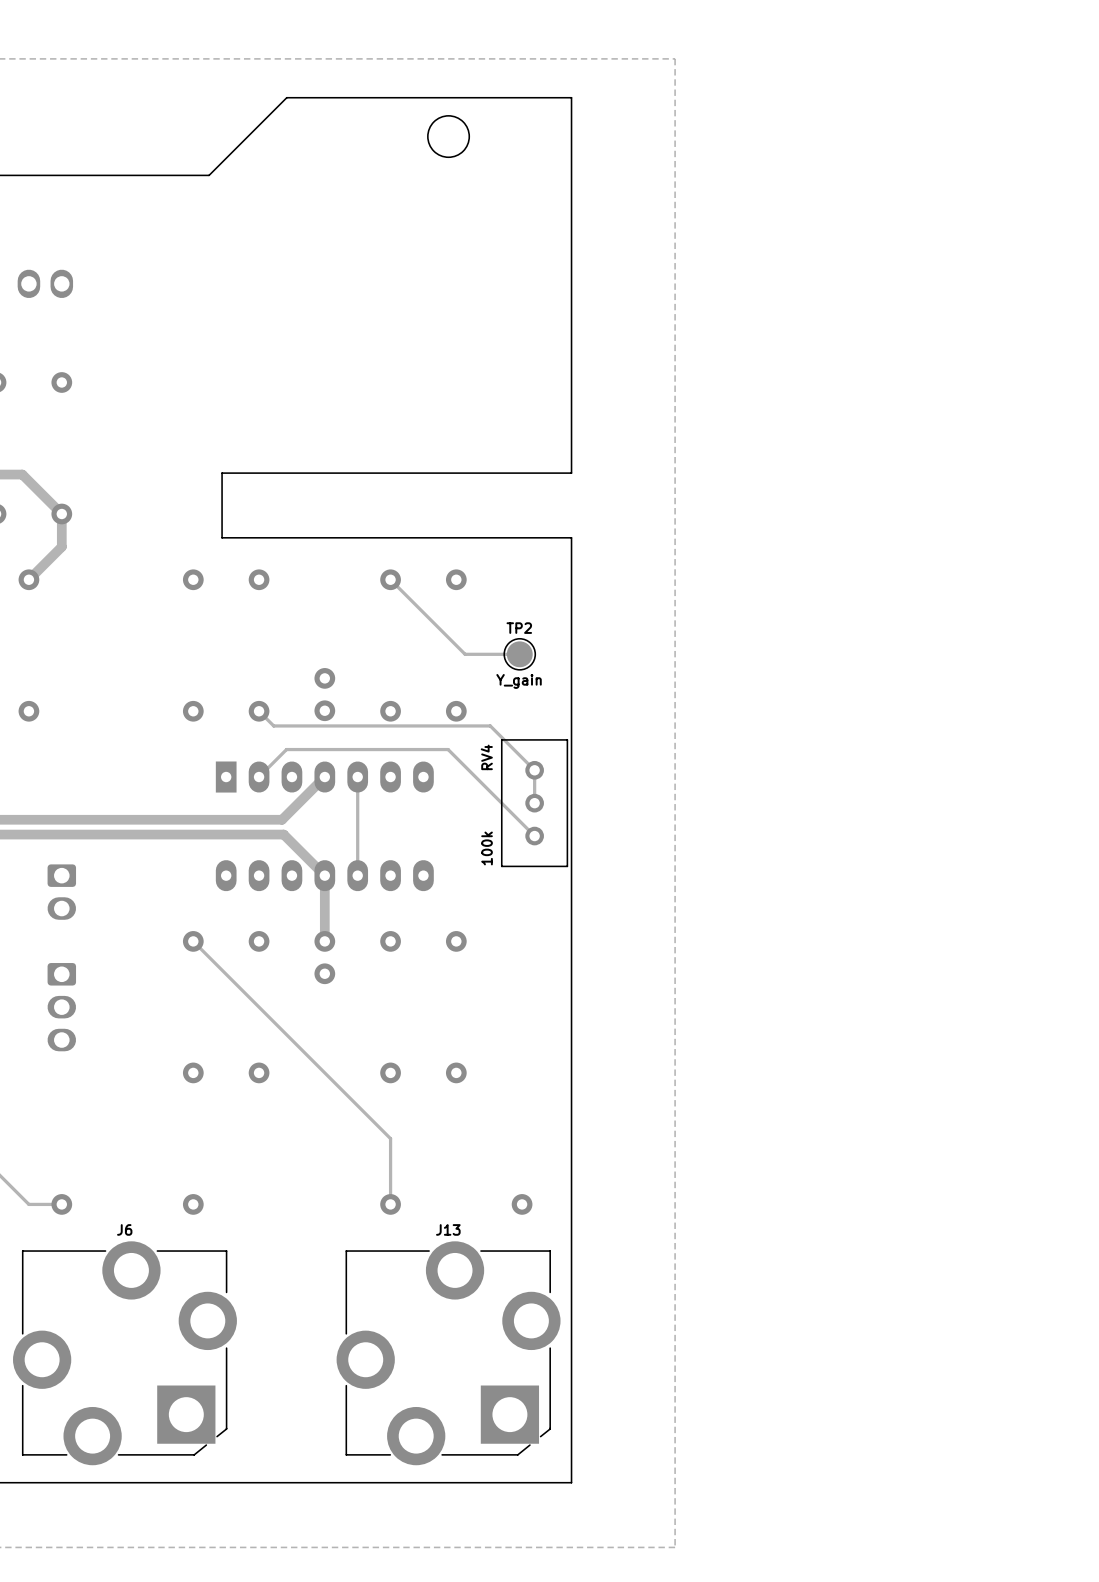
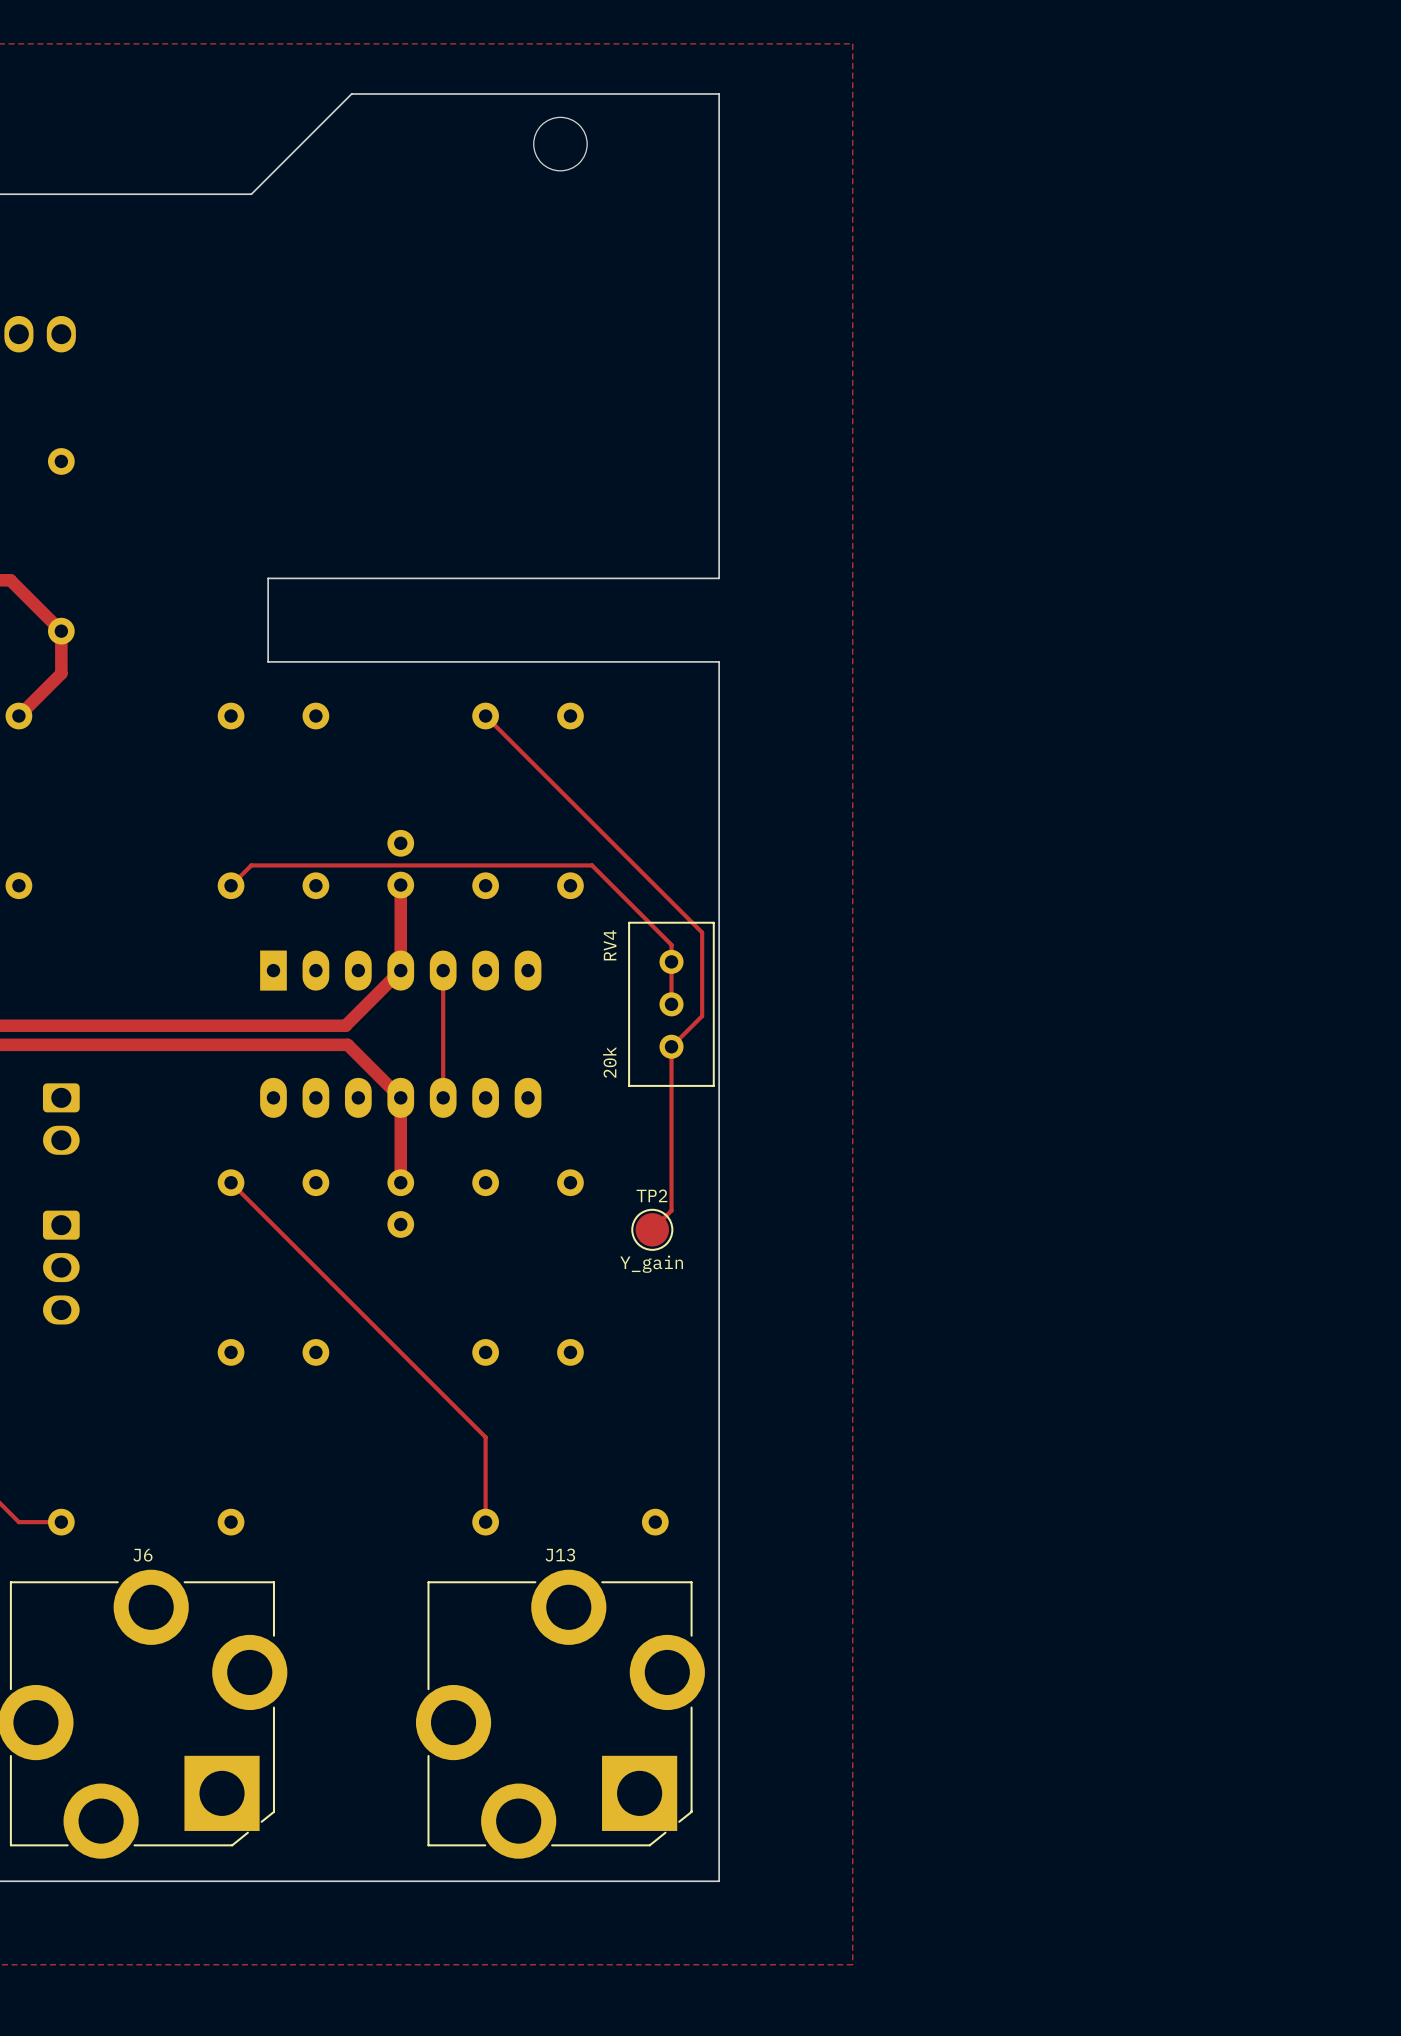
track: (465, 654) (519, 654) -> (581, 812) (702, 932) (702, 1016) (671, 1046) (671, 1210) (652, 1229)
TP2 position: (519, 654) -> (652, 1229)
track: none -> (400, 885) (400, 970)
track: (259, 711) (273, 725) (490, 725) (534, 770) -> (231, 885) (251, 865) (592, 865) (671, 944) (671, 961)
track: (259, 777) (286, 749) (448, 749) (534, 836) -> none
RV4 value: 100k (487, 848) -> 20k (609, 1062)

